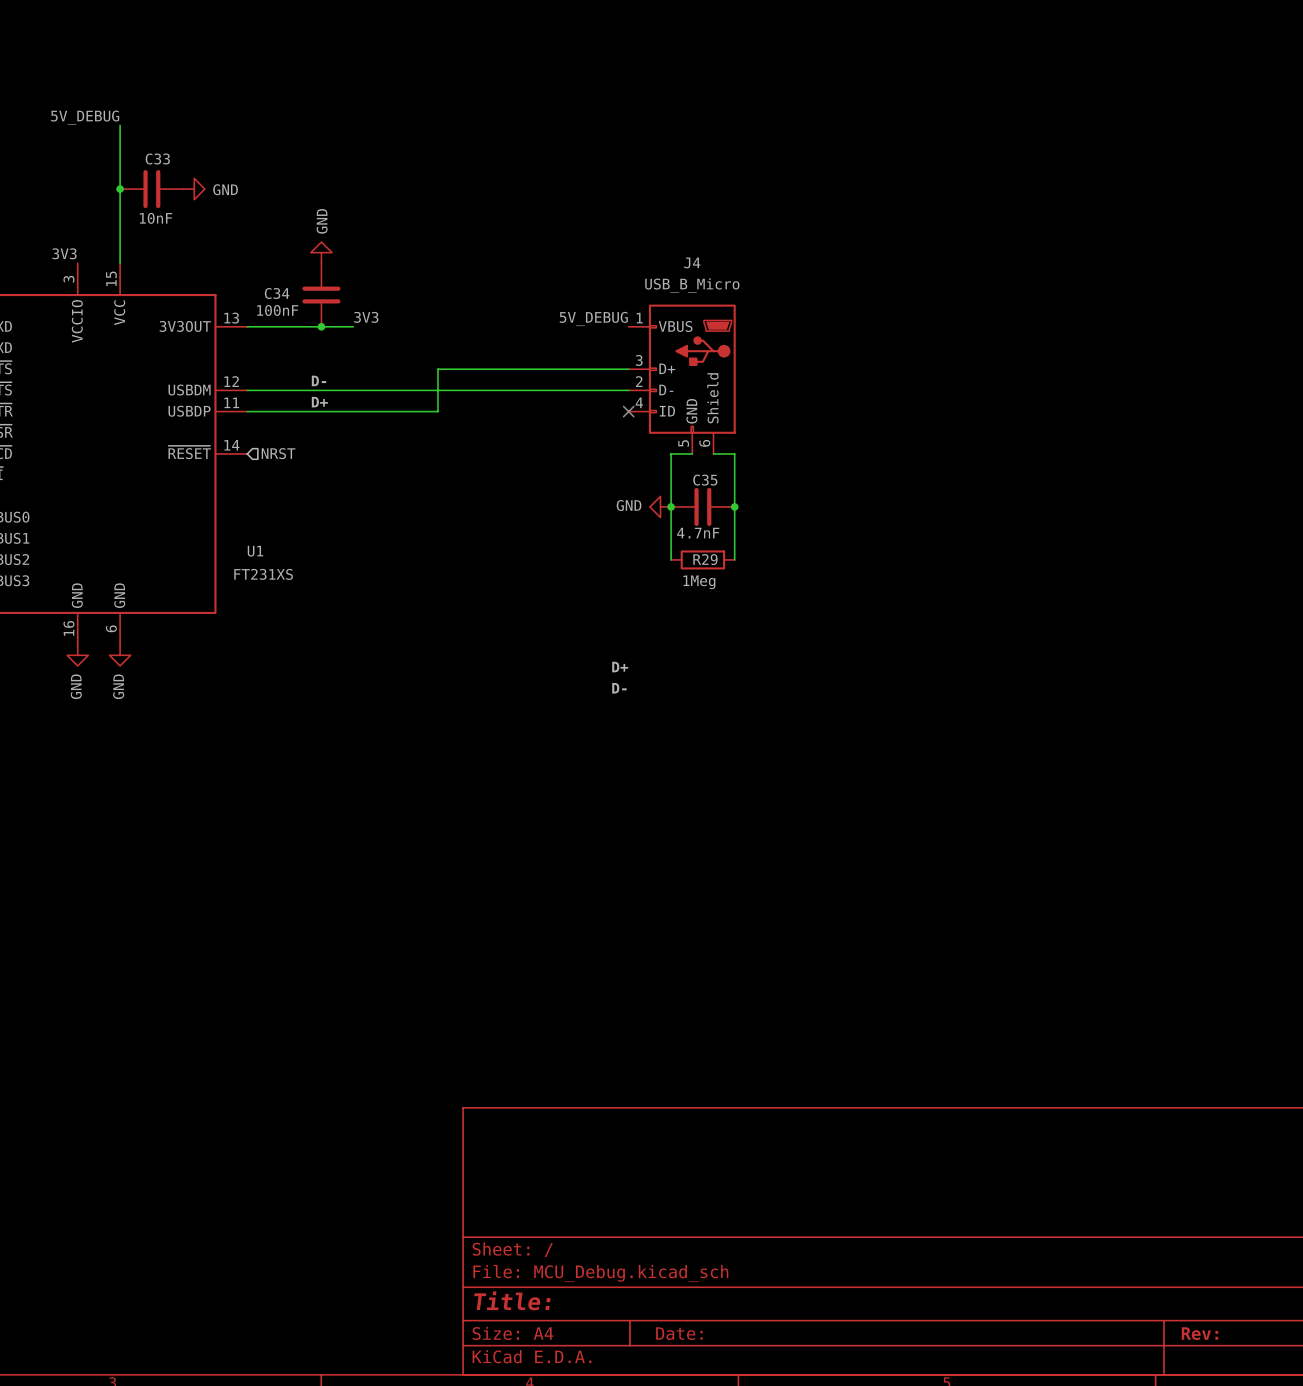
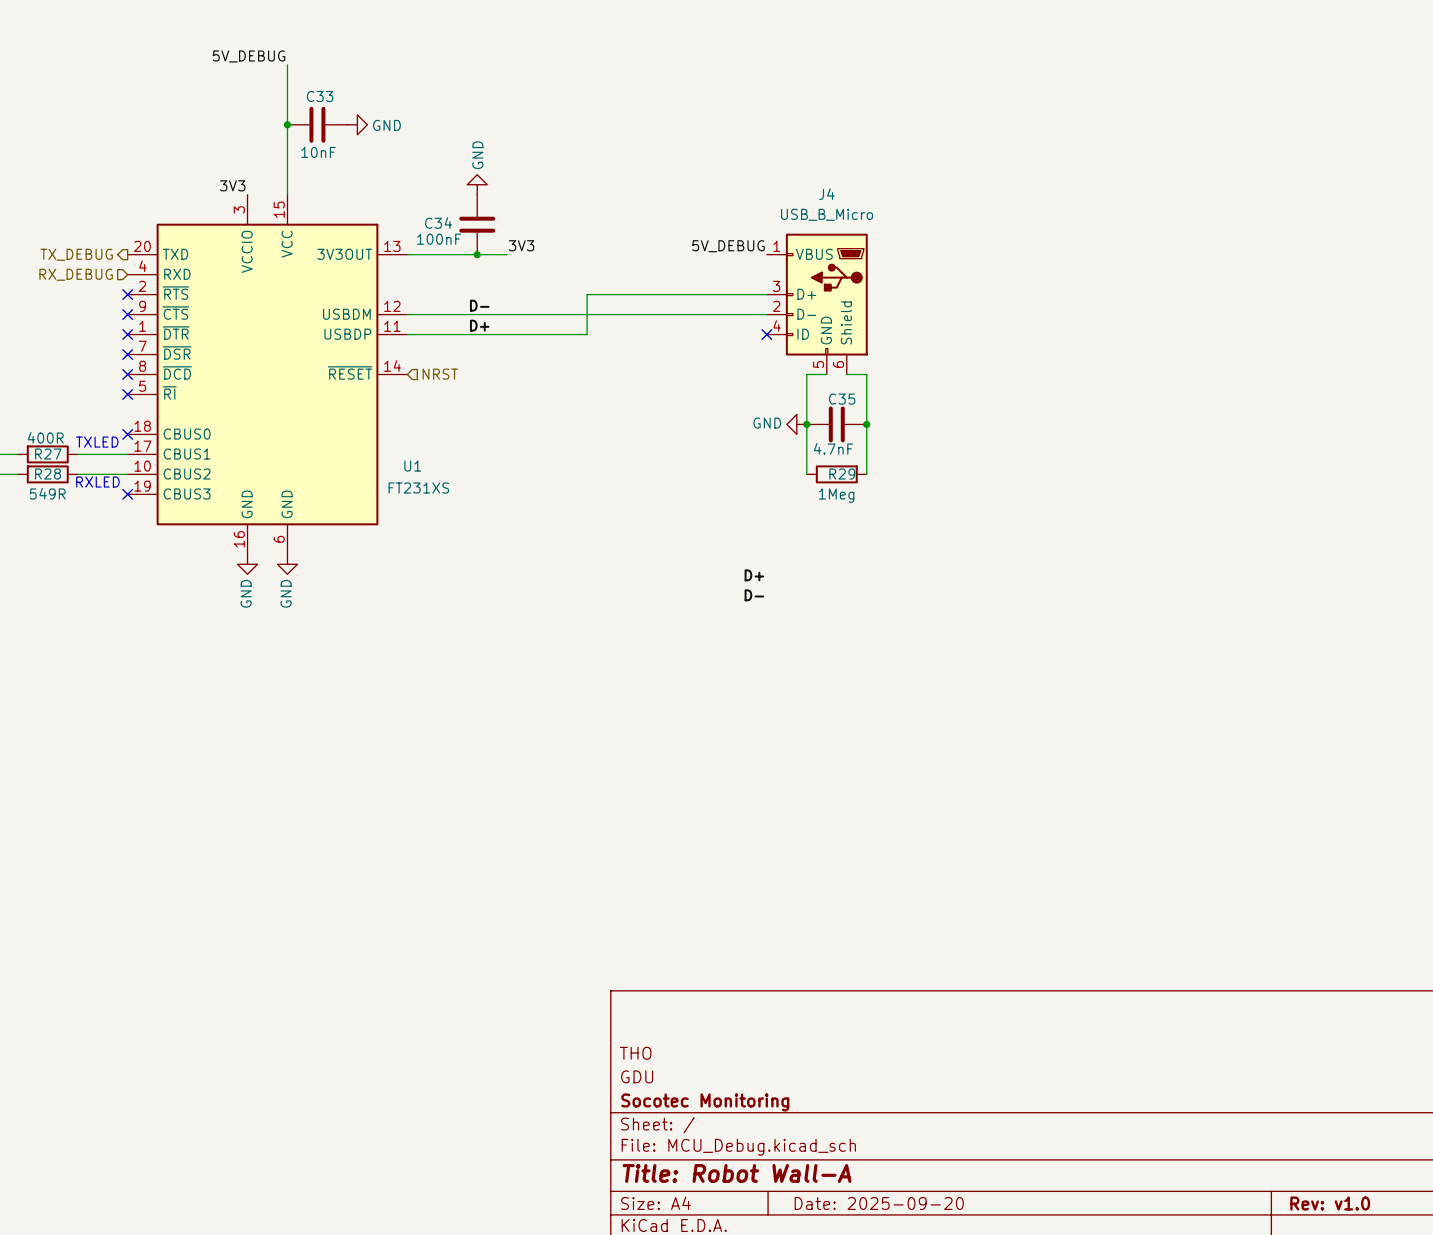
title block: none -> THO (635, 1053)
title block: none -> GDU (637, 1076)
title block: none -> Socotec Monitoring (705, 1102)
title block: Title: (512, 1300) -> Title: Robot Wall-A (737, 1173)
title block: Date: (679, 1333) -> Date: 2025-09-20 (879, 1203)
title block: Rev: (1199, 1333) -> Rev: v1.0 (1330, 1203)

